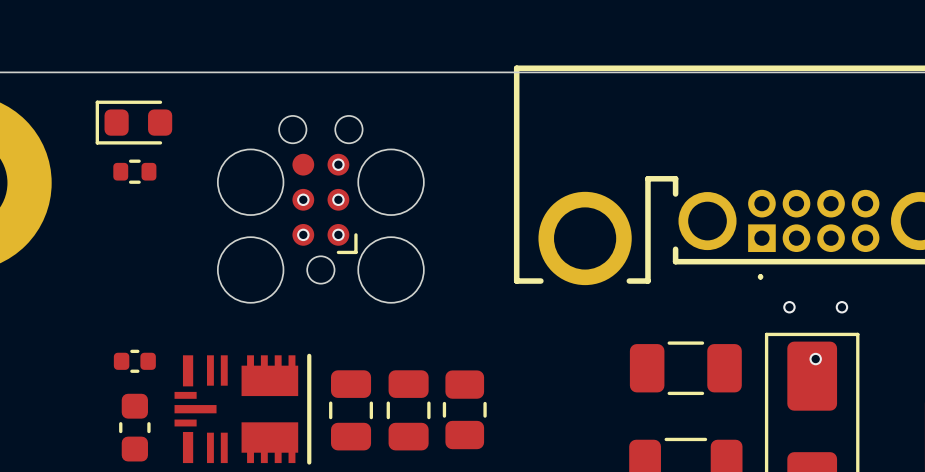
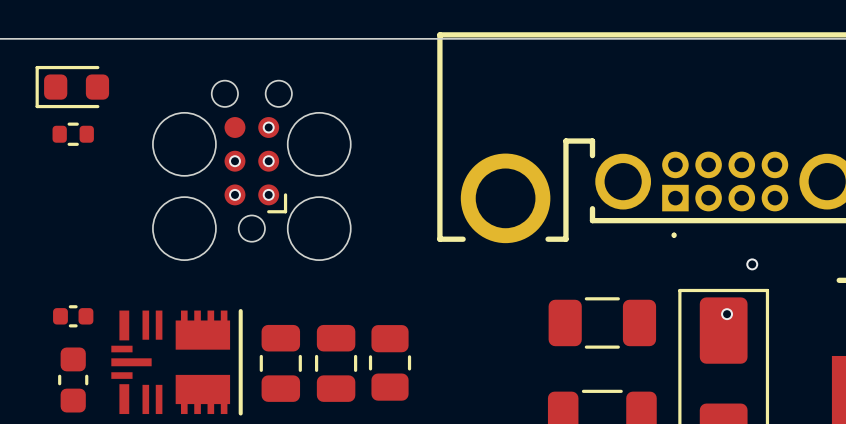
via: (789, 307) -> none

